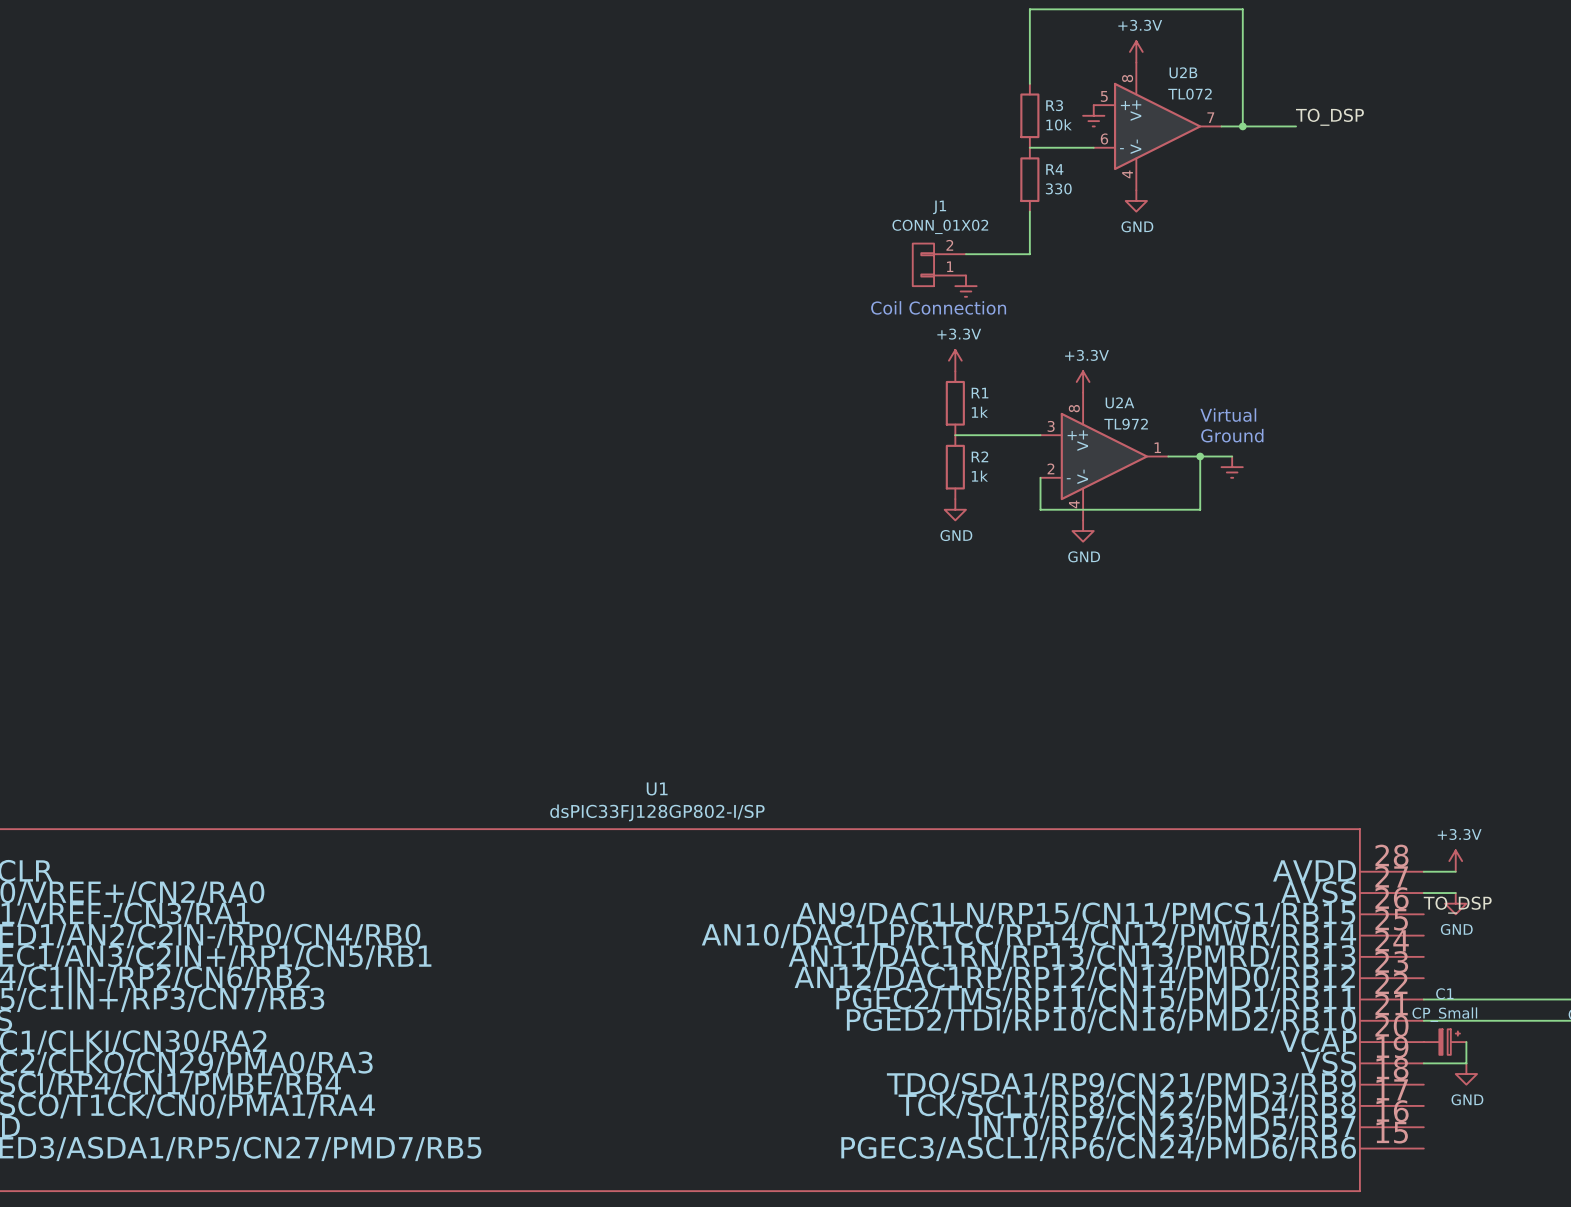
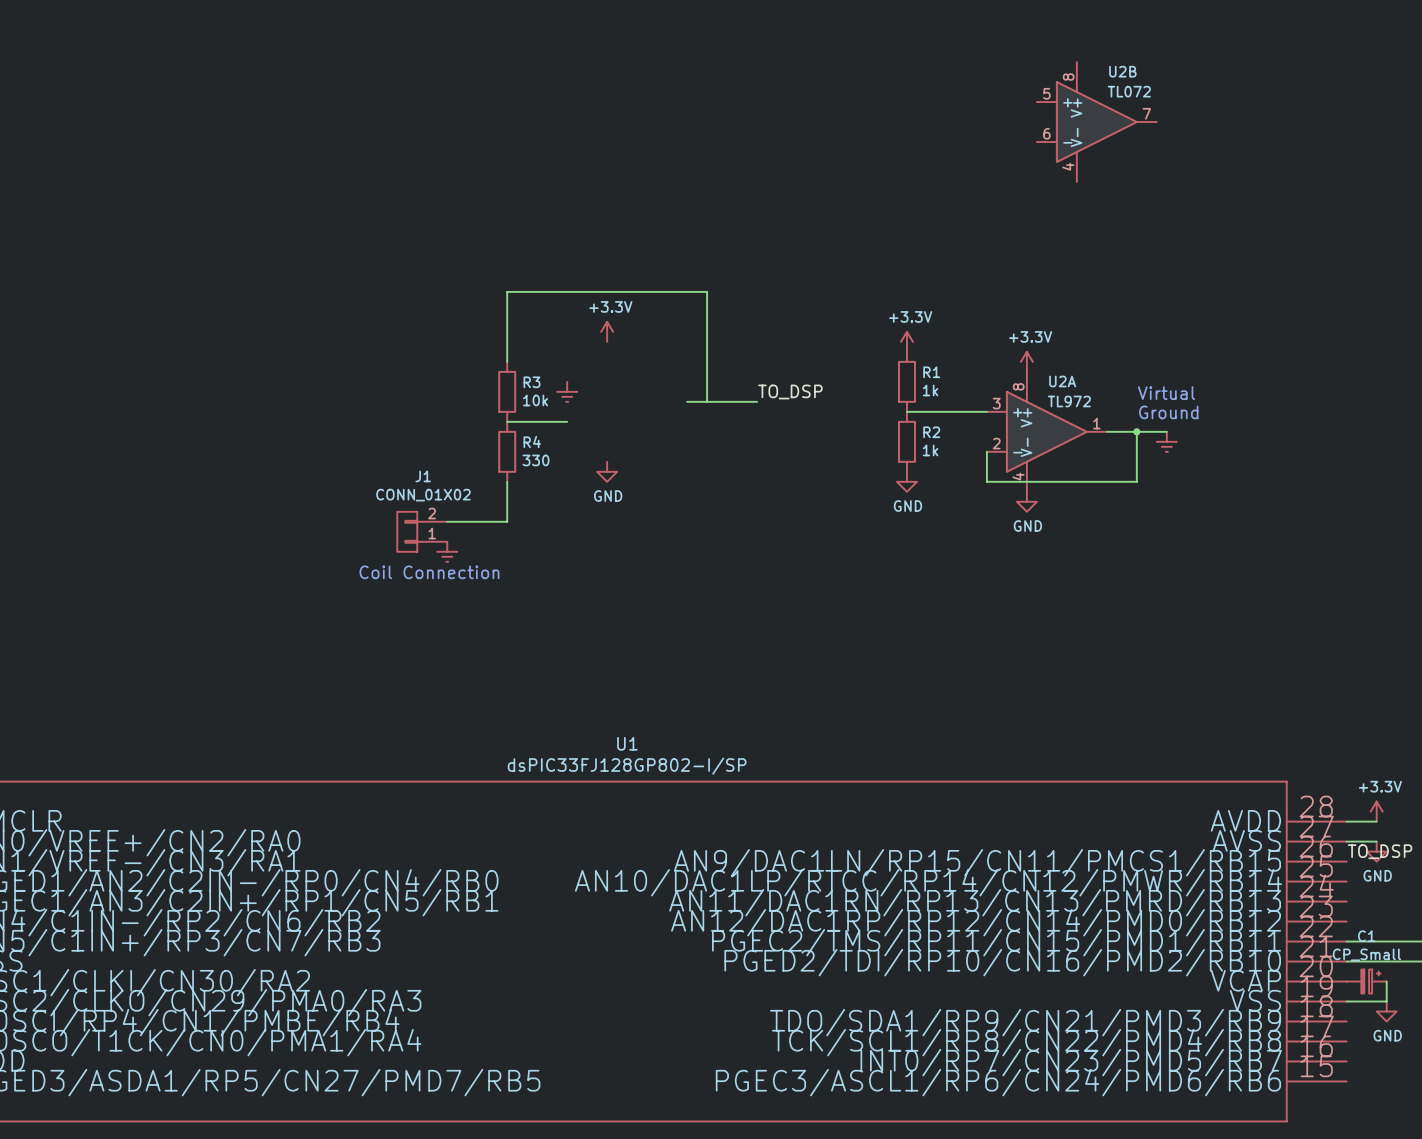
power symbol: +3.3V (1136, 51) -> none
wire: (1029, 83) (1029, 9) (1242, 9) (1242, 126) -> none
R3 position: (1029, 115) -> (507, 391)
power symbol: (1093, 115) -> none
label: TO_DSP (1329, 117) -> none
wire: (1221, 126) (1296, 126) -> none
junction: (1242, 126) -> none
wire: (1029, 147) (1093, 147) -> none
R4 position: (1029, 179) -> (507, 451)
power symbol: GND (1136, 200) -> none
wire: (1029, 211) (1029, 254) (965, 254) -> none
J1 position: (939, 264) -> (422, 531)
power symbol: (965, 286) -> none
text: Coil Connection (938, 307) -> none
power symbol: none -> +3.3V (607, 331)
wire: none -> (507, 361) (507, 291) (707, 291) (707, 401)
power symbol: none -> (567, 391)
label: none -> TO_DSP (790, 391)
wire: none -> (687, 401) (757, 401)
wire: none -> (507, 421) (567, 421)
power symbol: none -> GND (607, 471)
wire: none -> (507, 481) (507, 521) (447, 521)
power symbol: none -> (447, 551)
text: none -> Coil Connection (429, 572)

